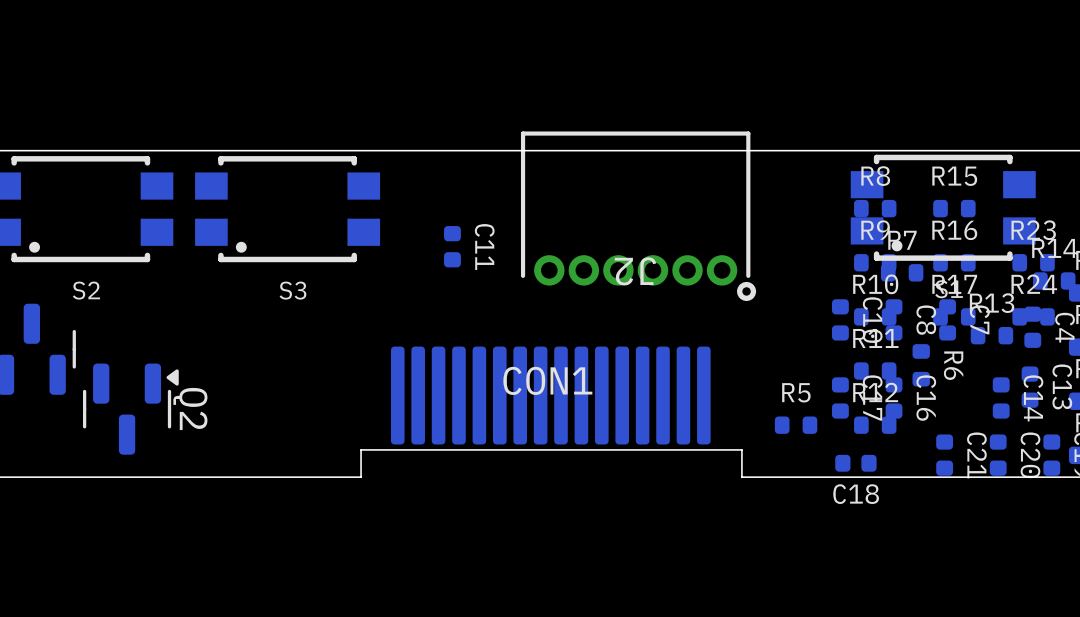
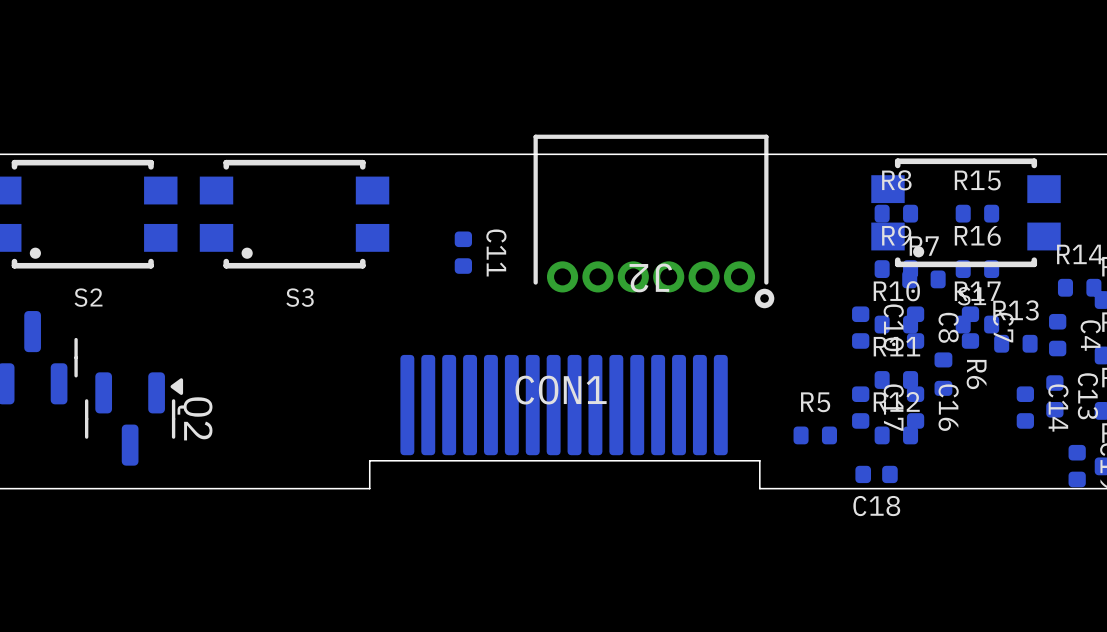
R23: (1033, 262) -> none
R24: (1033, 316) -> none
C21: (944, 455) -> none
C20: (998, 455) -> none

